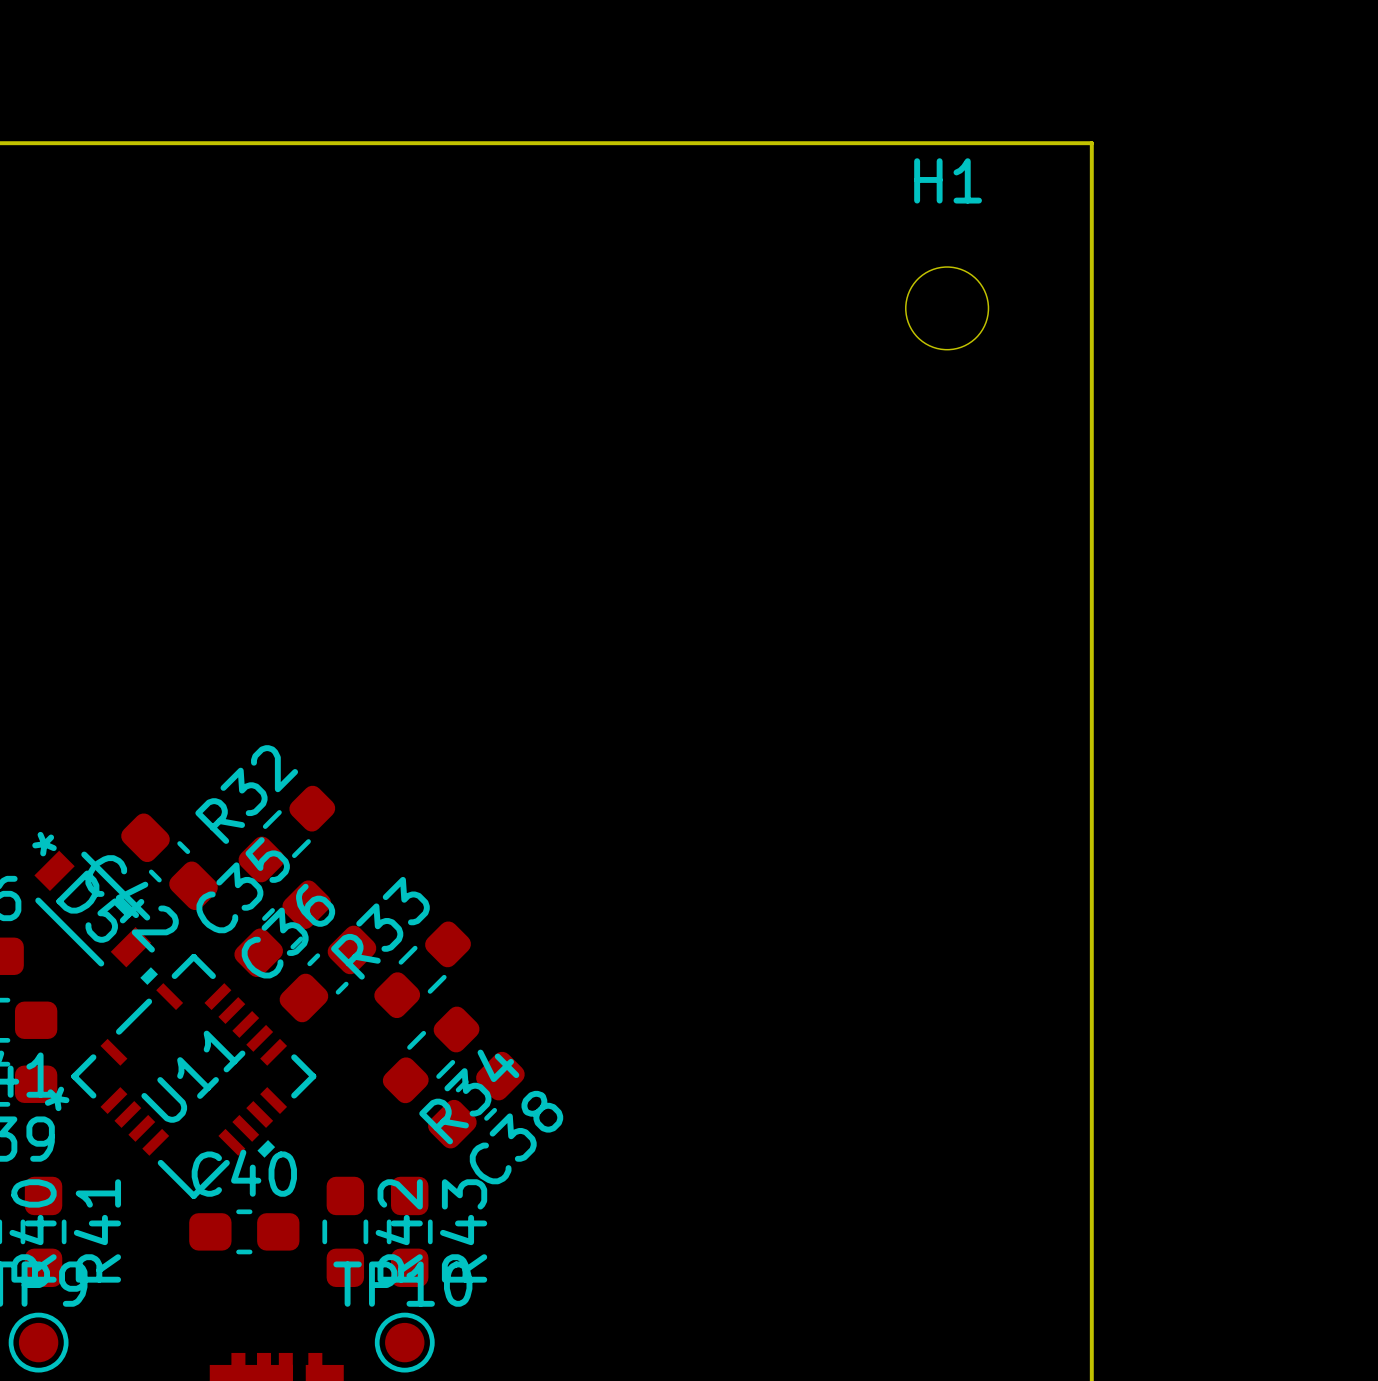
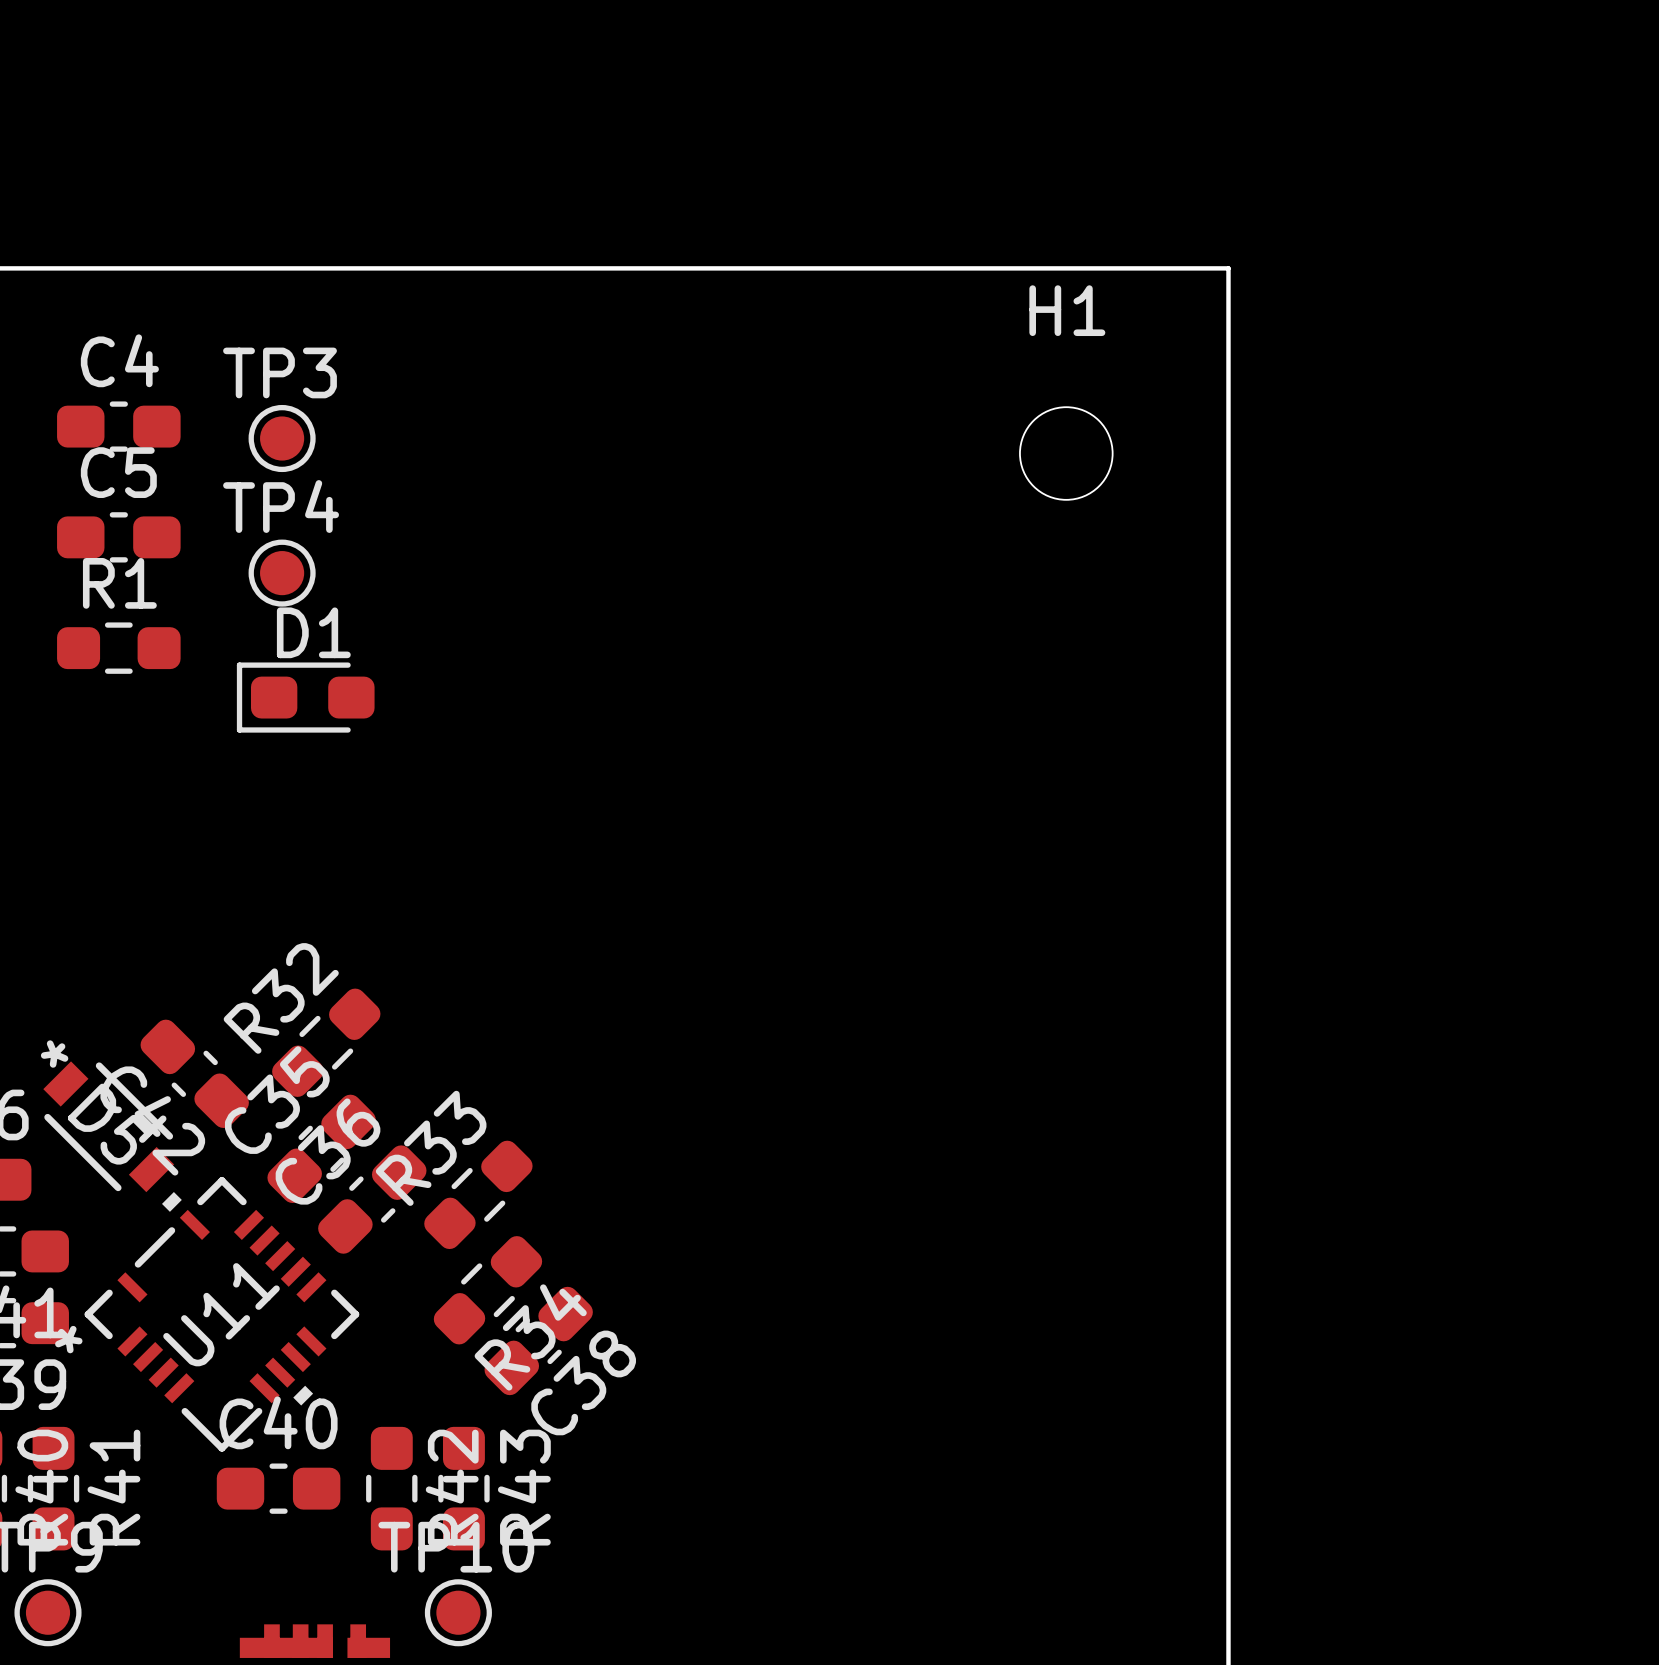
C4: none -> (118, 426)
TP3: none -> (282, 438)
C5: none -> (118, 537)
TP4: none -> (282, 573)
R1: none -> (118, 648)
D1: none -> (305, 697)

